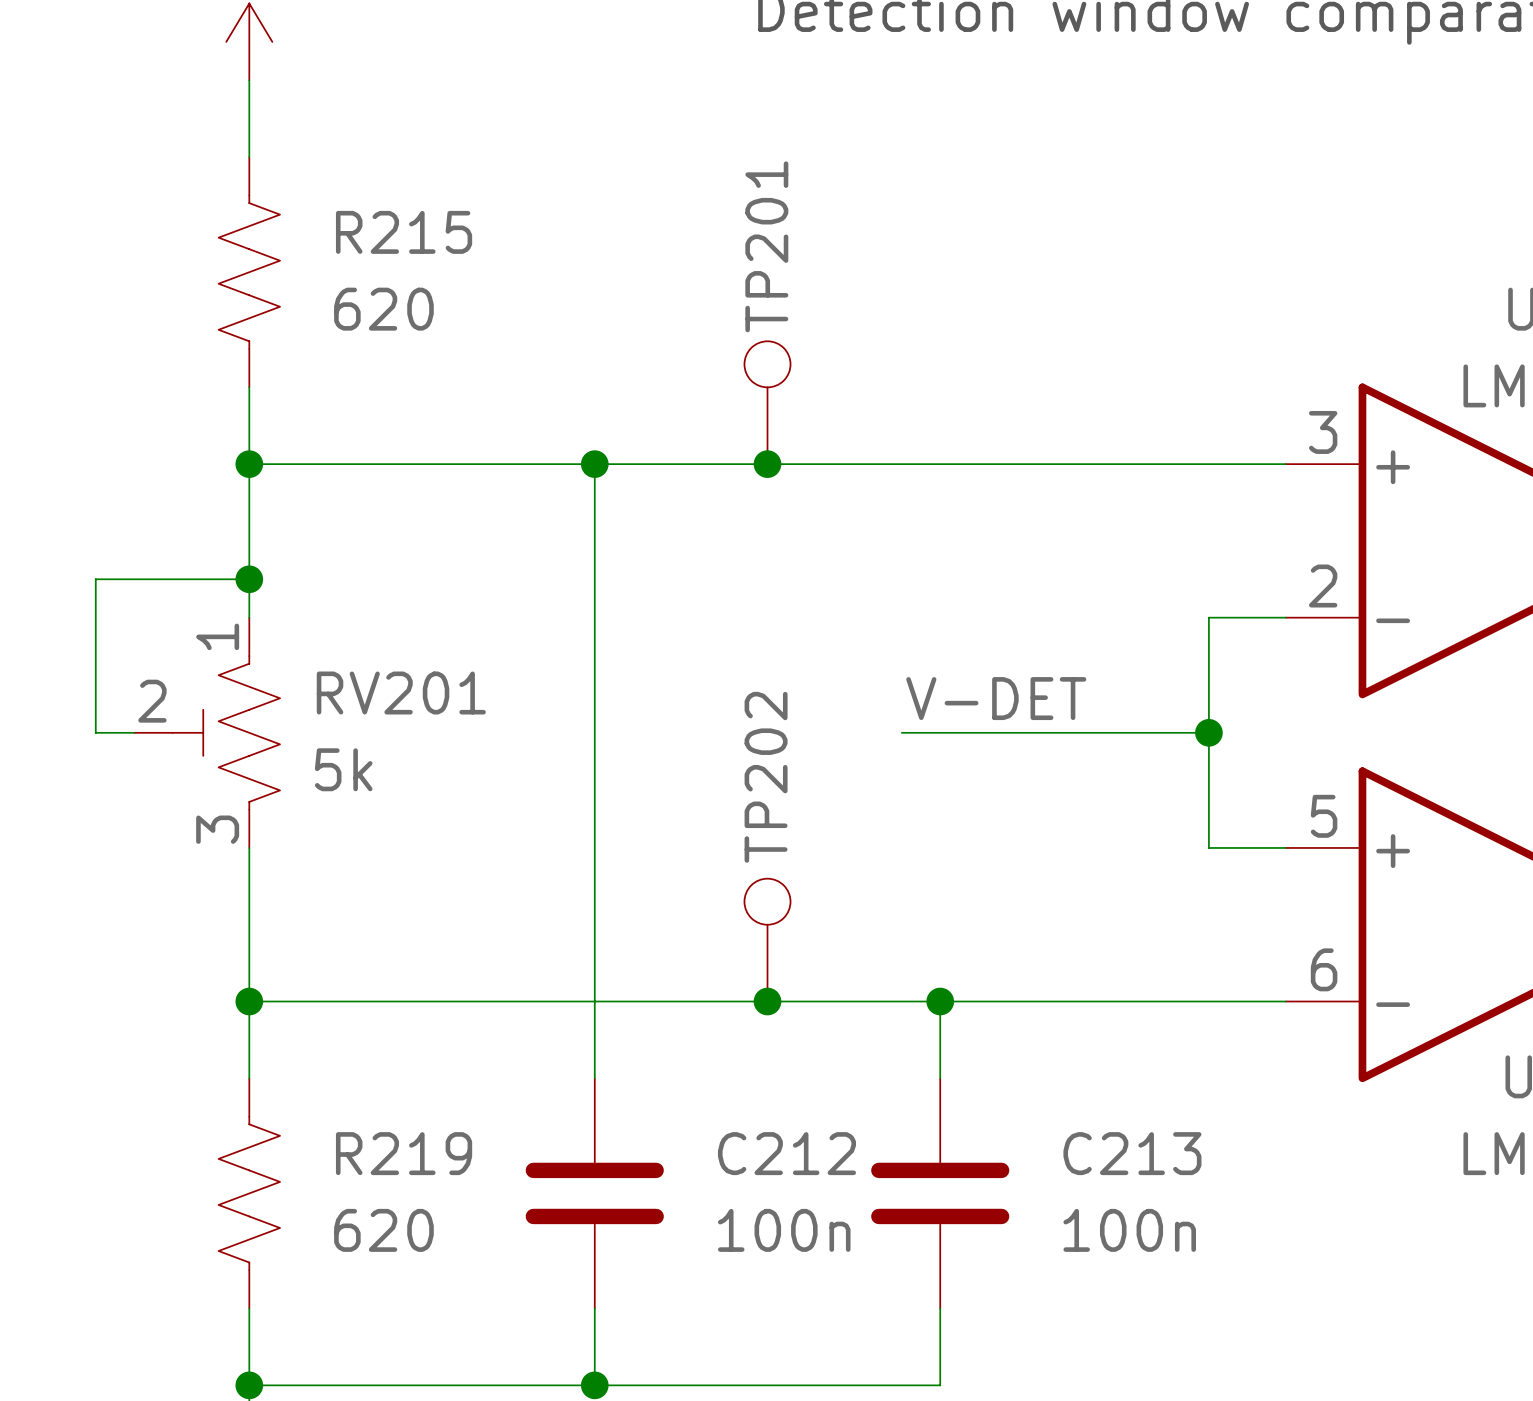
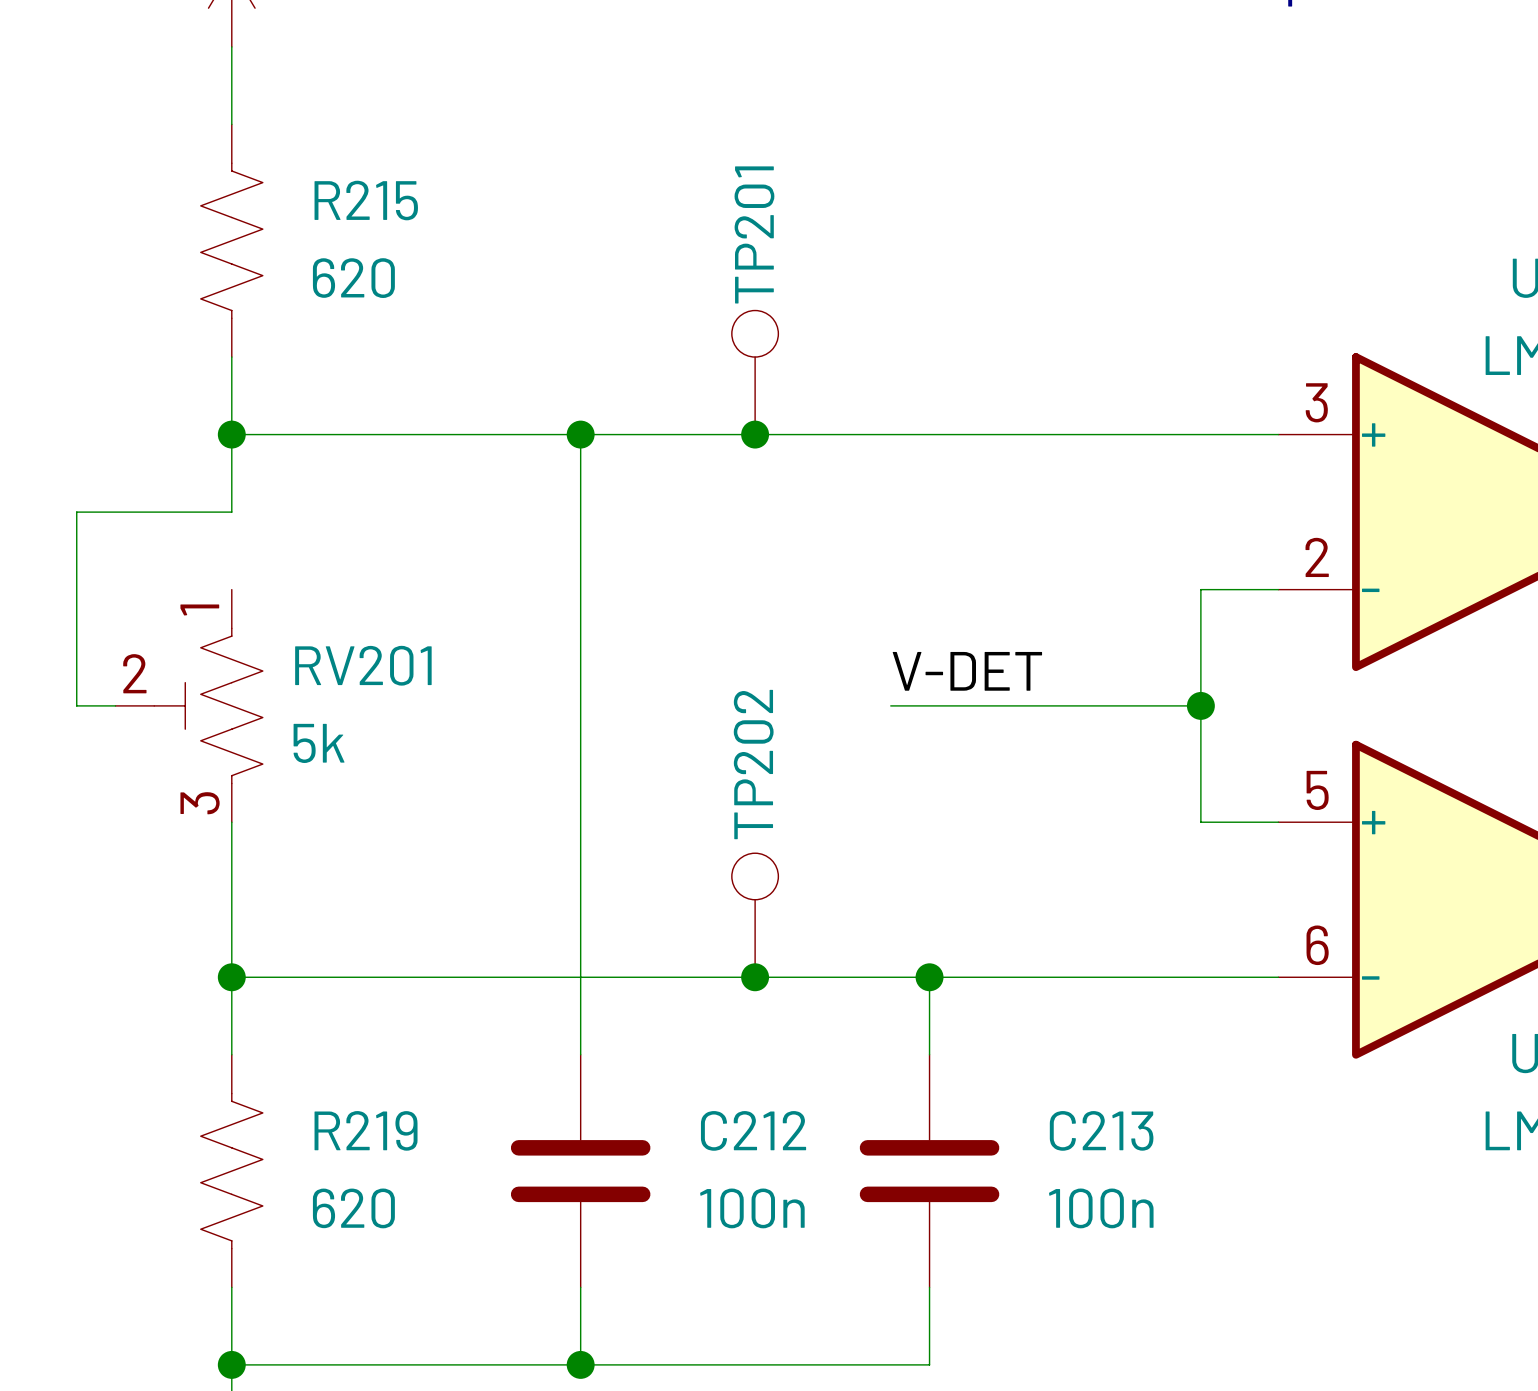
wire: (249, 540) (249, 617) -> none
wire: (95, 579) (249, 579) -> (76, 550) (76, 512) (231, 512)
junction: (249, 579) -> none

